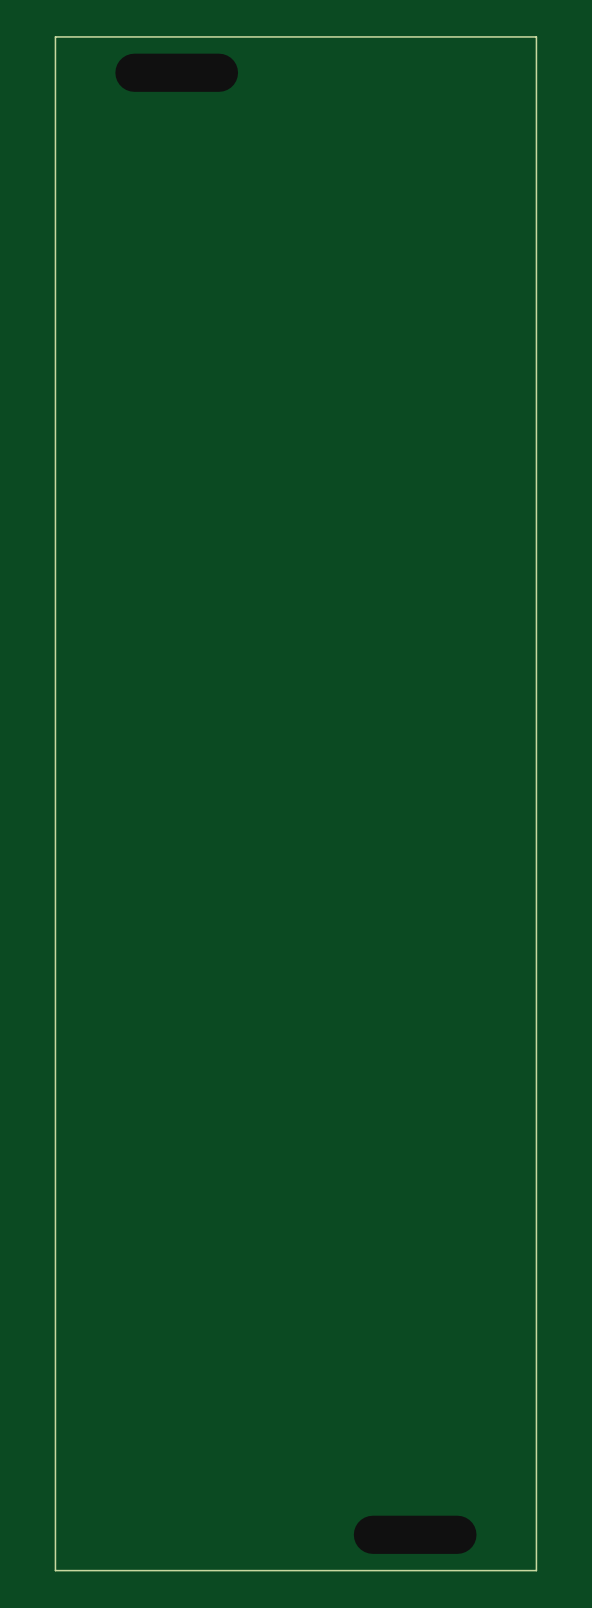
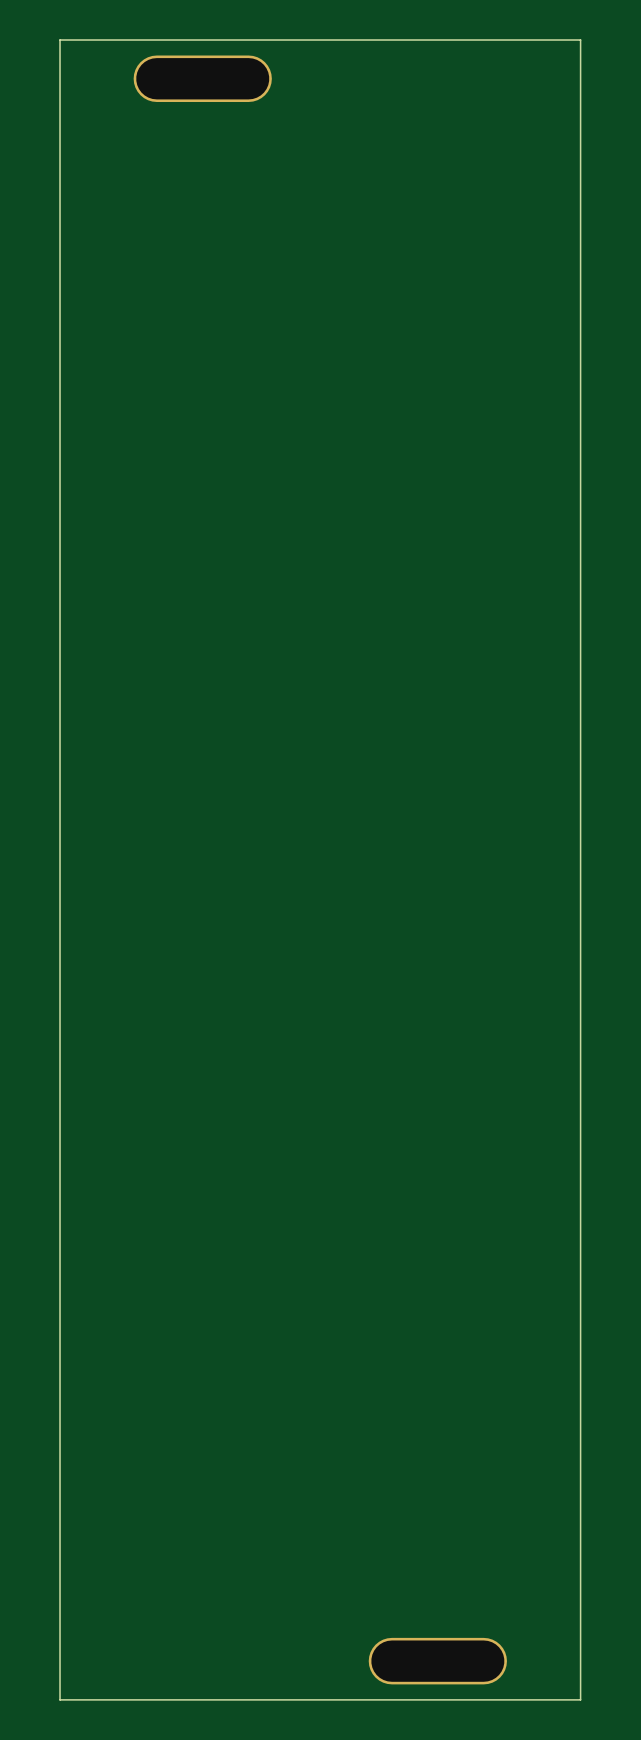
part footprint: [115, 53, 239, 92] -> [133, 55, 272, 103]
part footprint: [353, 1515, 477, 1554] -> [368, 1637, 507, 1685]

